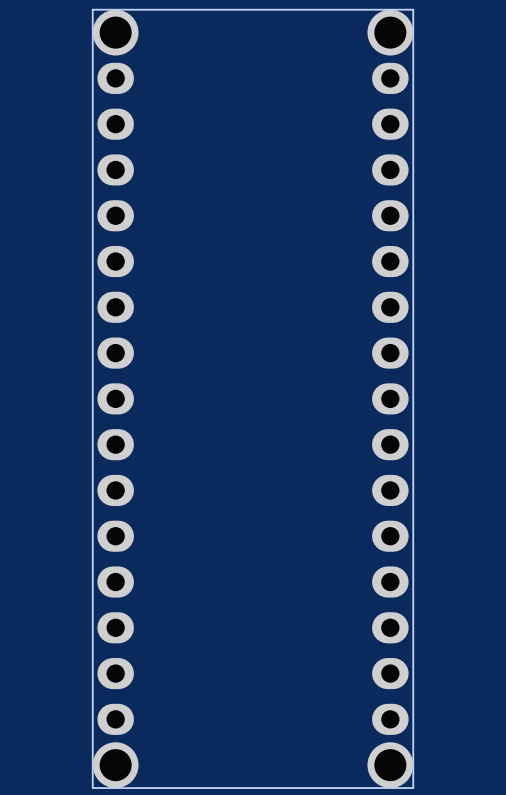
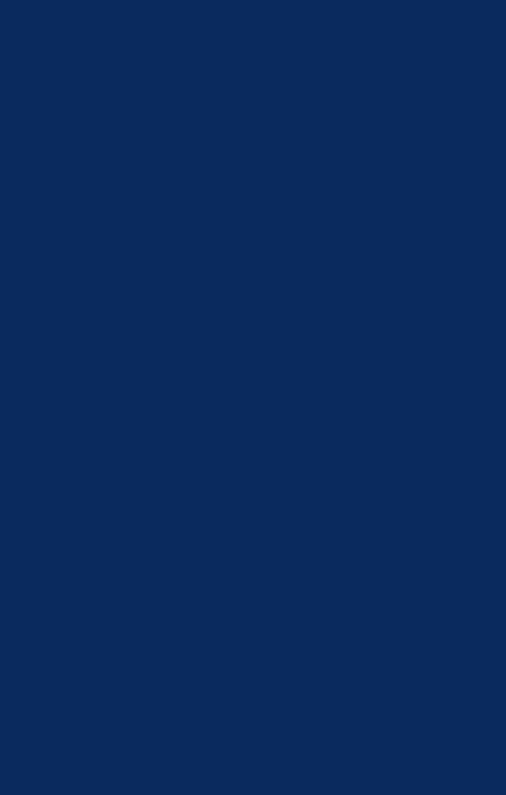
board edge: (413, 9) (413, 788) (92, 788) (92, 9) (413, 9) -> none
part: (115, 32) -> none
part: (390, 32) -> none
part: (115, 398) -> none
part: (390, 398) -> none
part: (115, 765) -> none
part: (390, 765) -> none

